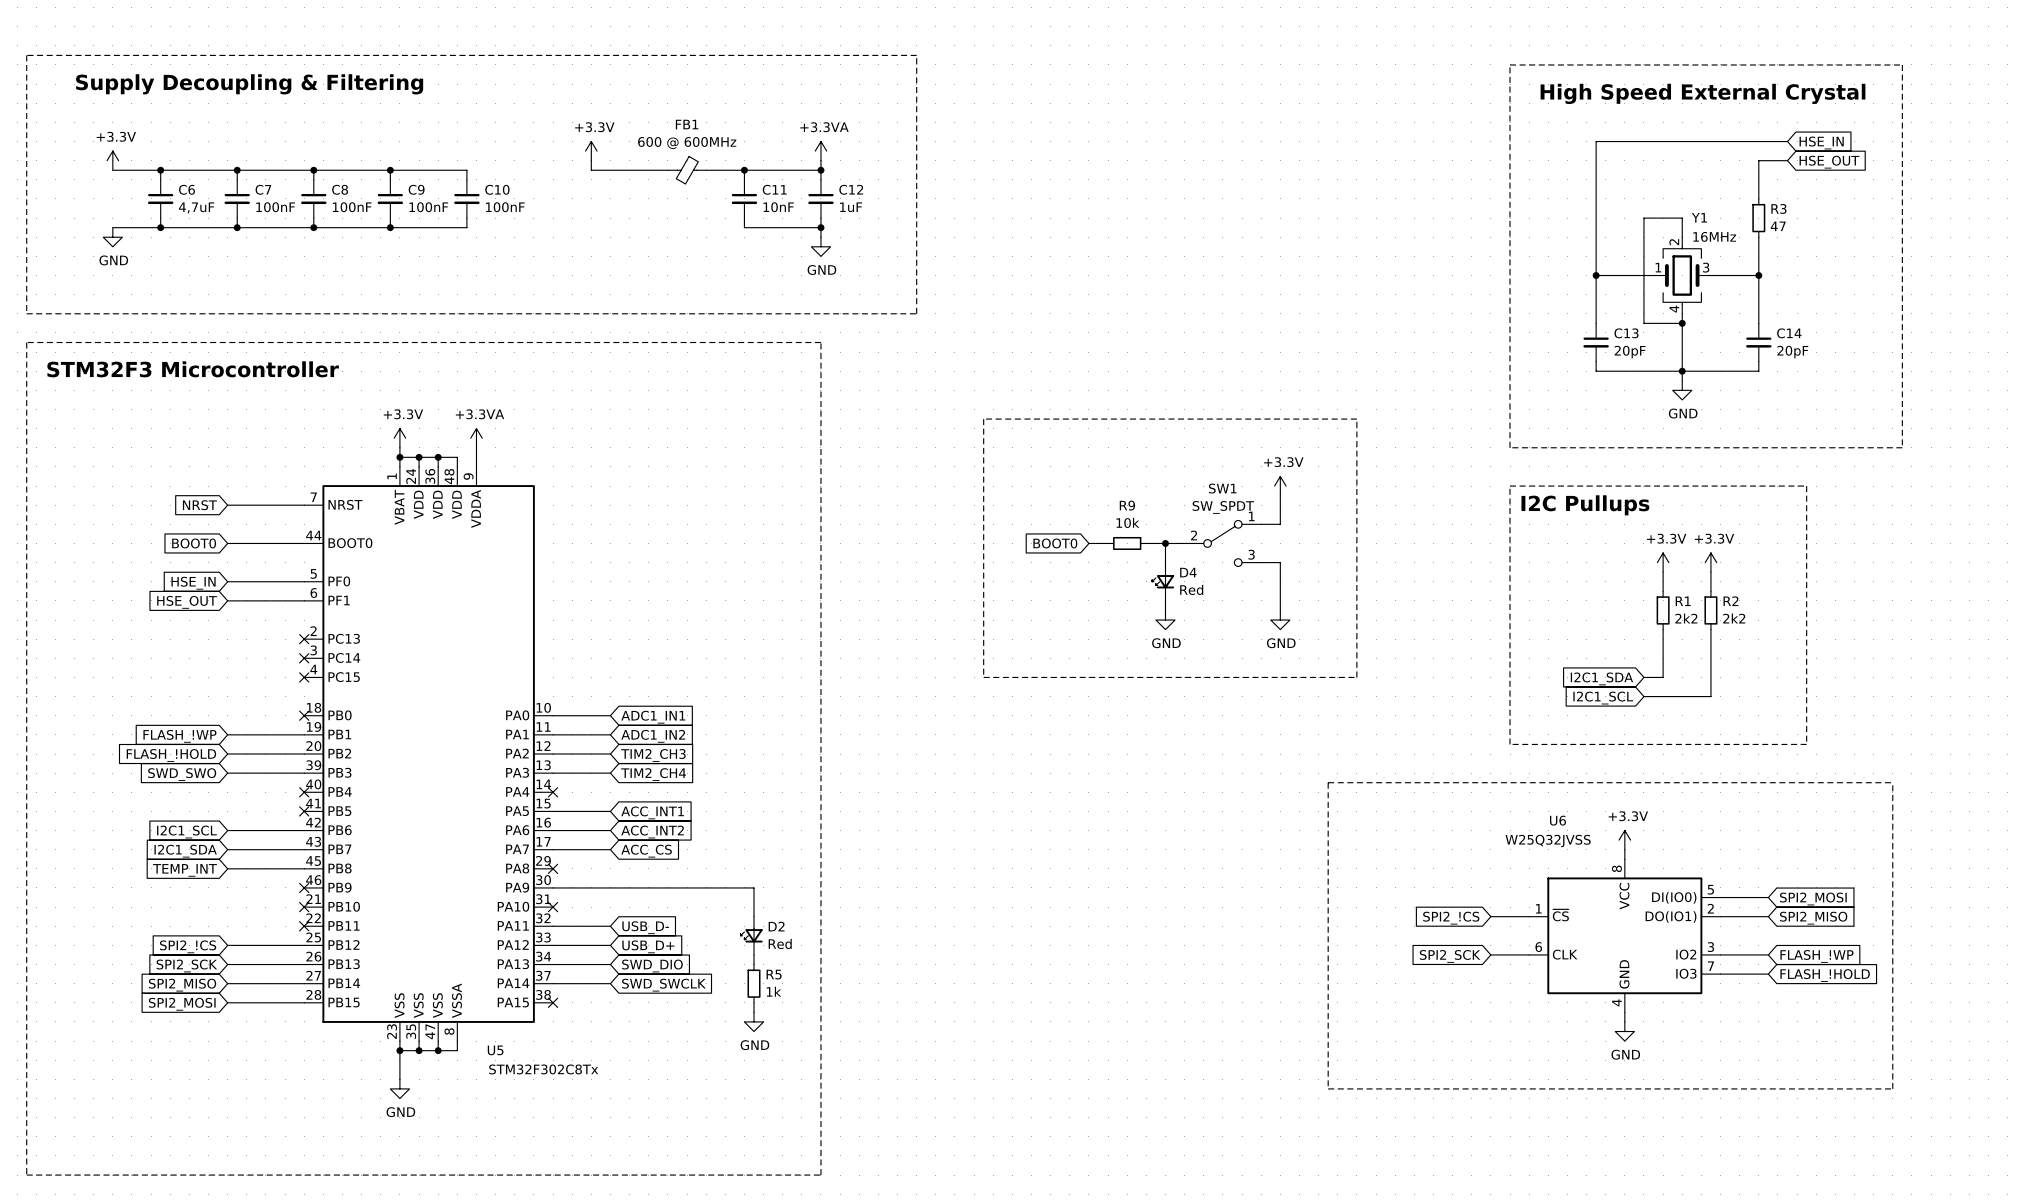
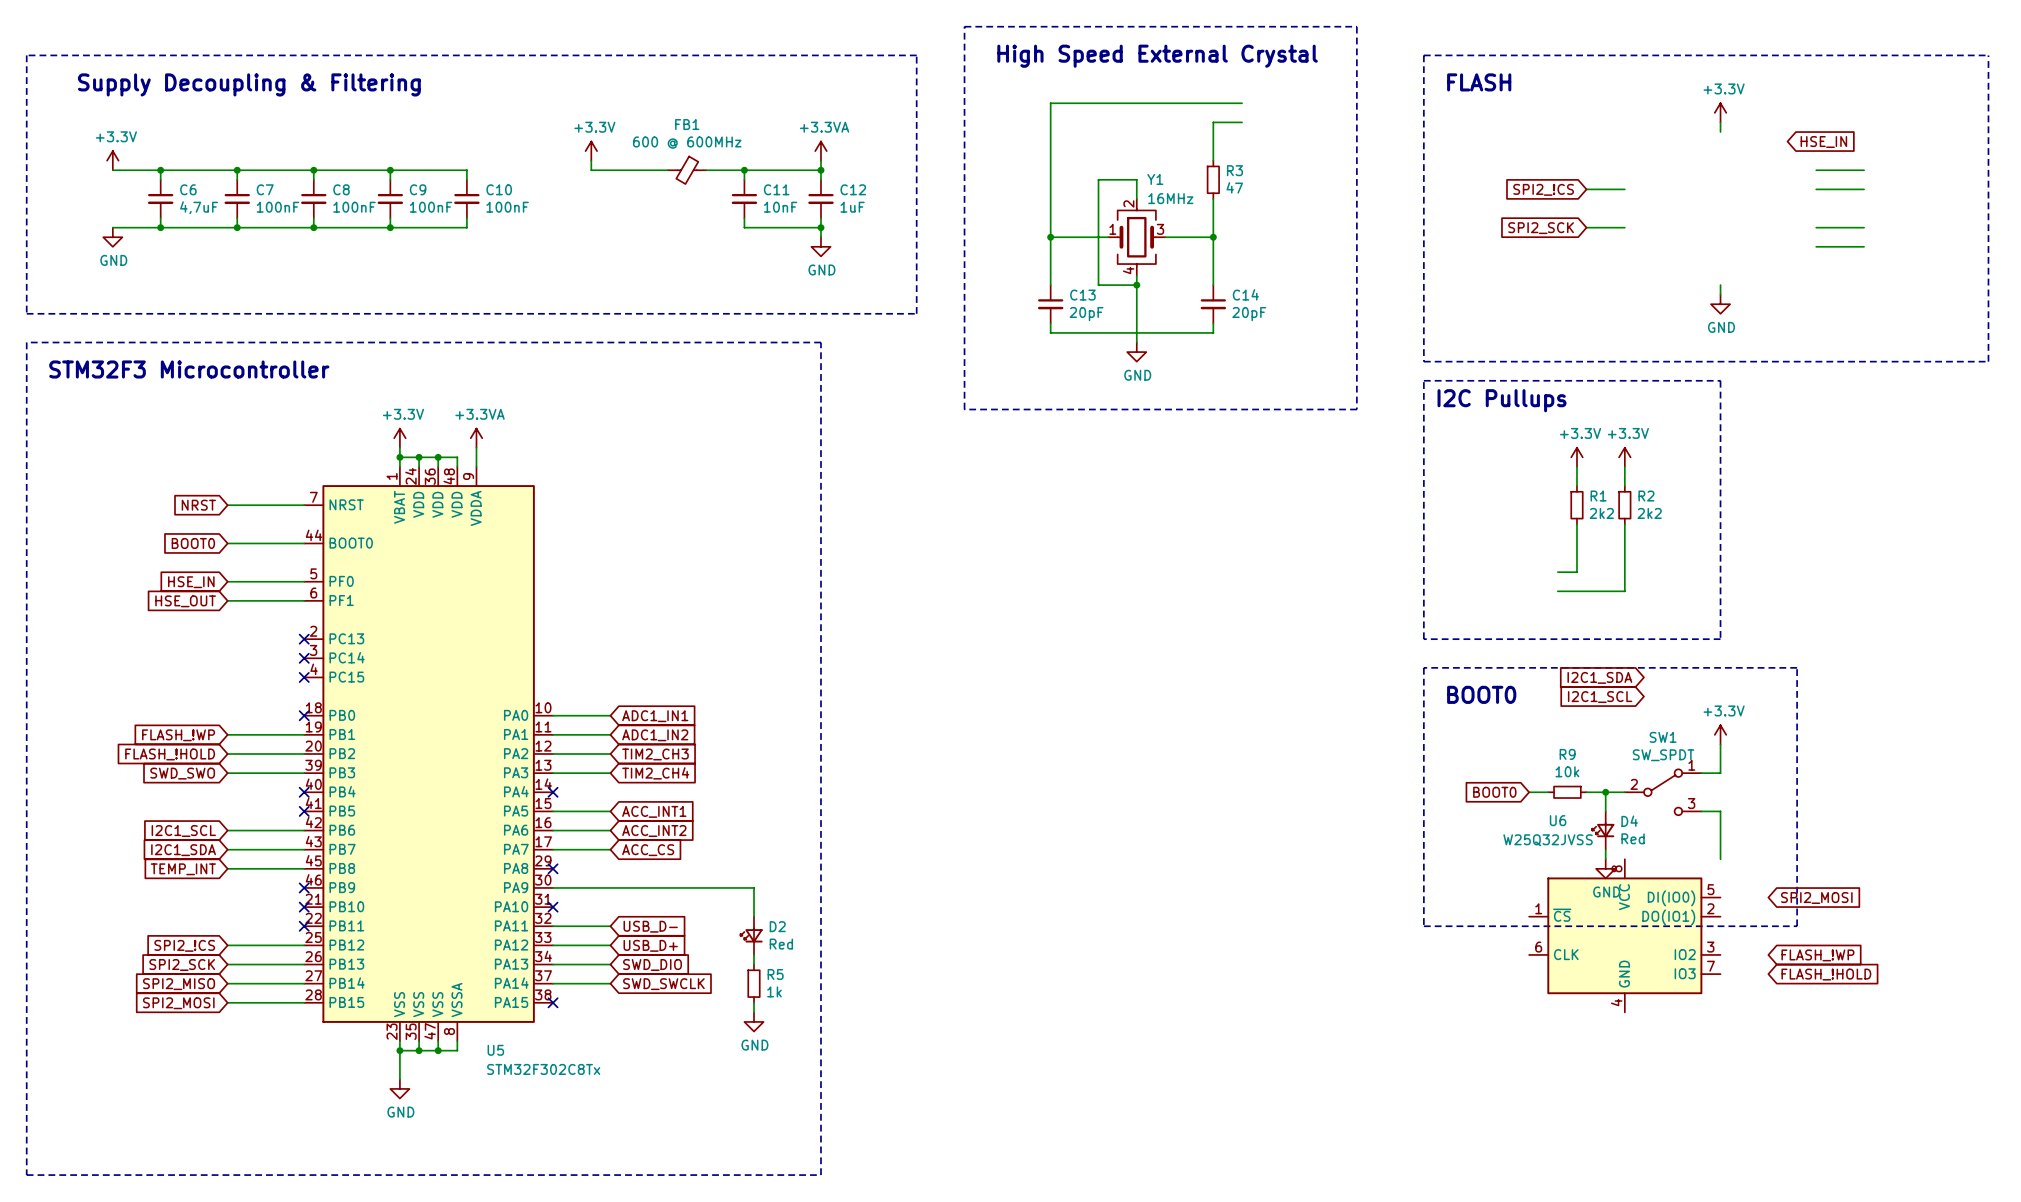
line: none -> (964, 26) (1356, 26) (1356, 409) (964, 409) (964, 26)
text: none -> High Speed External Crystal (1157, 56)
line: (1510, 64) (1902, 64) (1902, 447) (1510, 447) (1510, 64) -> (1423, 55) (1423, 361) (1988, 361) (1988, 55) (1423, 55)
text: none -> FLASH (1479, 82)
text: High Speed External Crystal (1703, 93) -> none
wire: none -> (1242, 103) (1050, 103) (1050, 285)
power symbol: none -> +3.3V (1720, 112)
wire: none -> (1242, 122) (1213, 122) (1213, 160)
wire: none -> (1720, 122) (1720, 131)
wire: (1787, 141) (1596, 141) (1596, 323) -> none
wire: (1787, 160) (1758, 160) (1758, 198) -> none
global label: HSE_OUT (1829, 162) -> none
wire: none -> (1586, 189) (1624, 189)
wire: none -> (1816, 189) (1864, 189)
global label: none -> SPI2_!CS (1543, 189)
wire: none -> (1136, 198) (1136, 179) (1098, 179) (1098, 285) (1136, 285)
wire: none -> (1213, 198) (1213, 285)
R3 position: (1758, 218) -> (1213, 179)
wire: none -> (1586, 227) (1624, 227)
wire: none -> (1816, 227) (1864, 227)
global label: none -> SPI2_SCK (1541, 228)
wire: none -> (1050, 237) (1108, 237)
junction: none -> (1050, 237)
wire: none -> (1165, 237) (1213, 237)
junction: none -> (1213, 237)
wire: (1682, 237) (1682, 218) (1643, 218) (1643, 323) (1682, 323) -> none
wire: (1758, 237) (1758, 323) -> none
wire: none -> (1136, 275) (1136, 342)
wire: (1596, 275) (1653, 275) -> none
junction: (1596, 275) -> none
Y1 position: (1682, 275) -> (1136, 237)
wire: (1710, 275) (1758, 275) -> (1816, 246) (1864, 246)
junction: (1758, 275) -> none
junction: none -> (1136, 285)
wire: none -> (1720, 285) (1720, 294)
wire: (1682, 313) (1682, 380) -> none
wire: none -> (1050, 323) (1050, 332) (1213, 332) (1213, 323)
junction: (1682, 323) -> none
C13 position: (1596, 342) -> (1050, 304)
C14 position: (1758, 342) -> (1213, 304)
power symbol: none -> GND (1136, 352)
wire: (1596, 361) (1596, 371) (1758, 371) (1758, 361) -> none
junction: (1682, 371) -> none
power symbol position: GND (1682, 390) -> GND (1720, 304)
line: (983, 419) (983, 677) (1356, 677) (1356, 419) (983, 419) -> none
power symbol: none -> +3.3V (1576, 457)
power symbol: none -> +3.3V (1624, 457)
power symbol: +3.3V (1280, 486) -> none
line: (1510, 486) (1510, 744) (1806, 744) (1806, 486) (1510, 486) -> (1423, 380) (1423, 639) (1720, 639) (1720, 380) (1423, 380)
wire: (1280, 495) (1280, 524) (1261, 524) -> none
text position: I2C Pullups (1585, 505) -> I2C Pullups (1502, 400)
global label: BOOT0 (1055, 543) -> none
wire: (1088, 543) (1108, 543) -> none
R9 position: (1127, 543) -> (1567, 792)
wire: (1146, 543) (1184, 543) -> none
wire: (1165, 543) (1165, 562) -> none
junction: (1165, 543) -> none
SW1 position: (1222, 543) -> (1663, 792)
wire: (1261, 562) (1280, 562) (1280, 610) -> none
power symbol: +3.3V (1663, 562) -> none
power symbol: +3.3V (1710, 562) -> none
wire: (1663, 572) (1663, 591) -> (1576, 466) (1576, 486)
wire: (1710, 572) (1710, 591) -> (1624, 466) (1624, 486)
D4 position: (1163, 581) -> (1603, 830)
wire: (1165, 600) (1165, 610) -> none
R1 position: (1663, 610) -> (1576, 505)
R2 position: (1710, 610) -> (1624, 505)
power symbol: GND (1165, 620) -> none
power symbol: GND (1280, 620) -> none
wire: (1663, 629) (1663, 677) (1643, 677) -> (1576, 524) (1576, 572) (1557, 572)
wire: (1710, 629) (1710, 696) (1643, 696) -> (1624, 524) (1624, 591) (1557, 591)
line: none -> (1423, 667) (1423, 926) (1797, 926) (1797, 667) (1423, 667)
text: none -> BOOT0 (1481, 694)
power symbol: none -> +3.3V (1720, 734)
wire: none -> (1720, 744) (1720, 773) (1701, 773)
line: (1328, 782) (1328, 1088) (1892, 1088) (1892, 782) (1328, 782) -> none
global label: none -> BOOT0 (1494, 792)
wire: none -> (1529, 792) (1548, 792)
wire: none -> (1605, 792) (1605, 811)
junction: none -> (1605, 792)
wire: none -> (1701, 811) (1720, 811) (1720, 859)
power symbol: +3.3V (1624, 840) -> none
wire: (1624, 849) (1624, 859) -> (1605, 849) (1605, 859)
wire: (1720, 897) (1768, 897) -> none
wire: (1490, 916) (1529, 916) -> (1586, 792) (1624, 792)
wire: (1720, 916) (1768, 916) -> none
global label: SPI2_!CS (1451, 918) -> none
global label: SPI2_MISO (1813, 918) -> none
wire: (1490, 954) (1529, 954) -> none
wire: (1720, 954) (1768, 954) -> none
global label: SPI2_SCK (1450, 956) -> none
wire: (1720, 974) (1768, 974) -> none
wire: (1624, 1012) (1624, 1021) -> none
power symbol position: GND (1624, 1031) -> GND (1605, 868)

